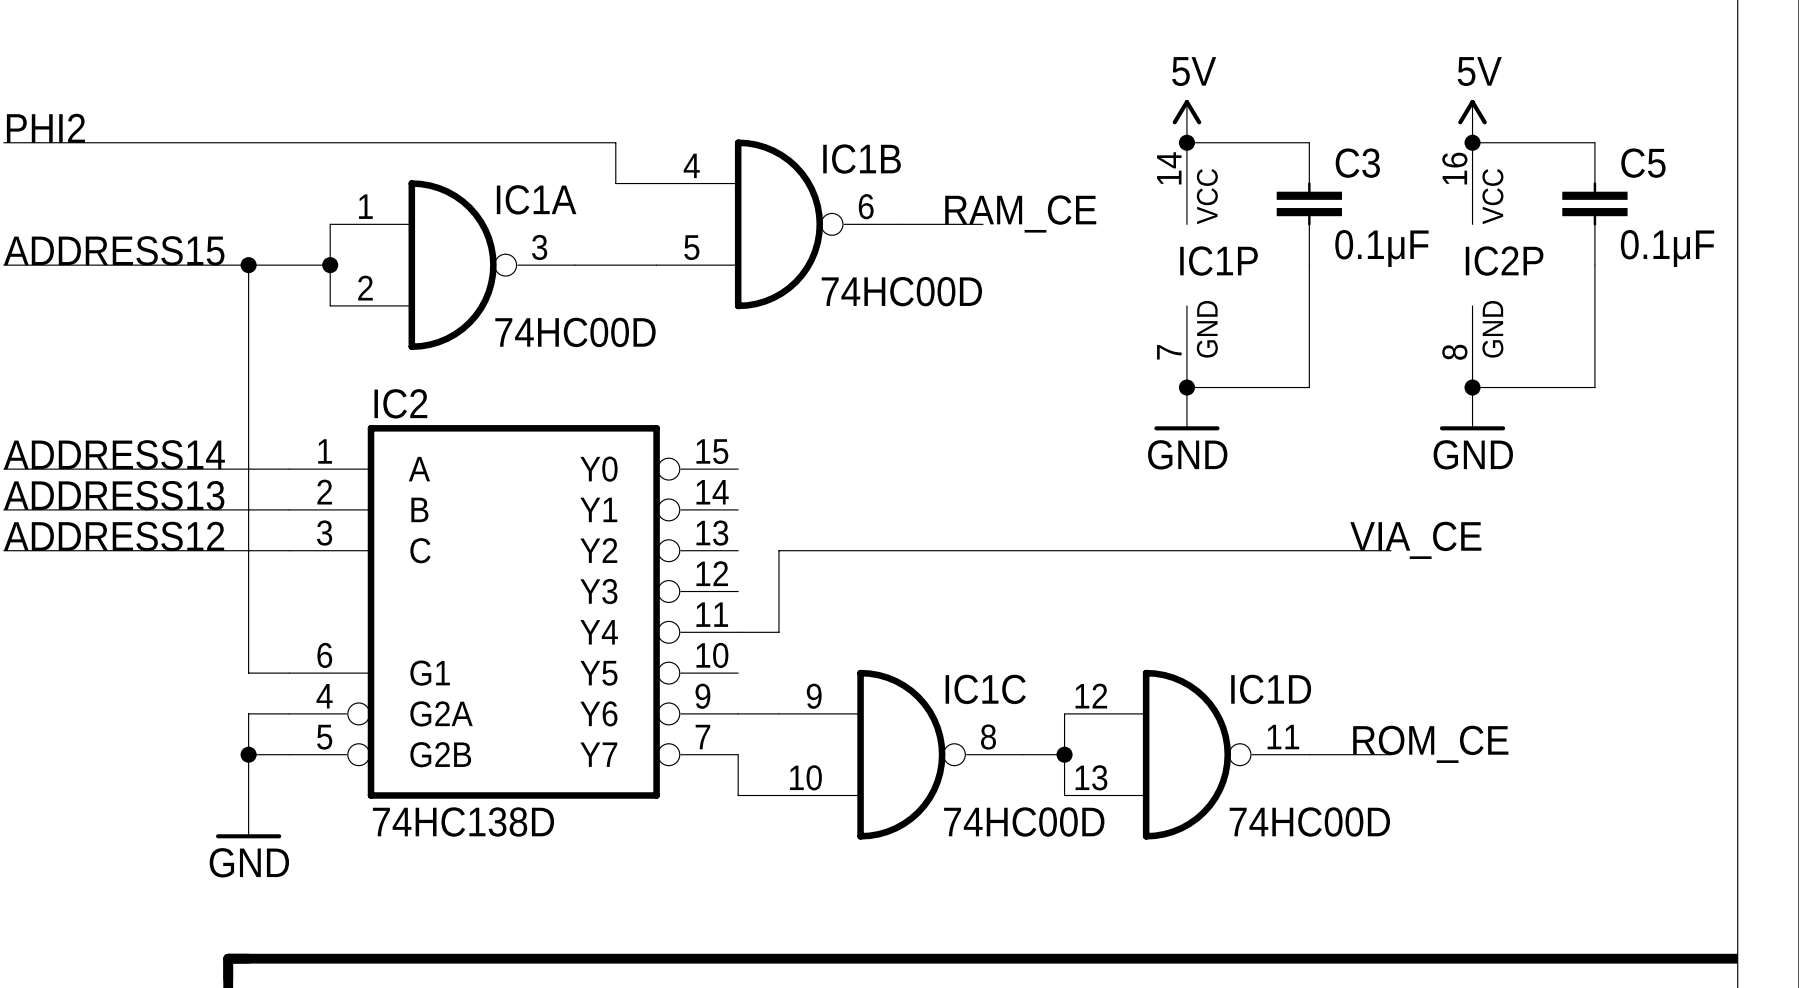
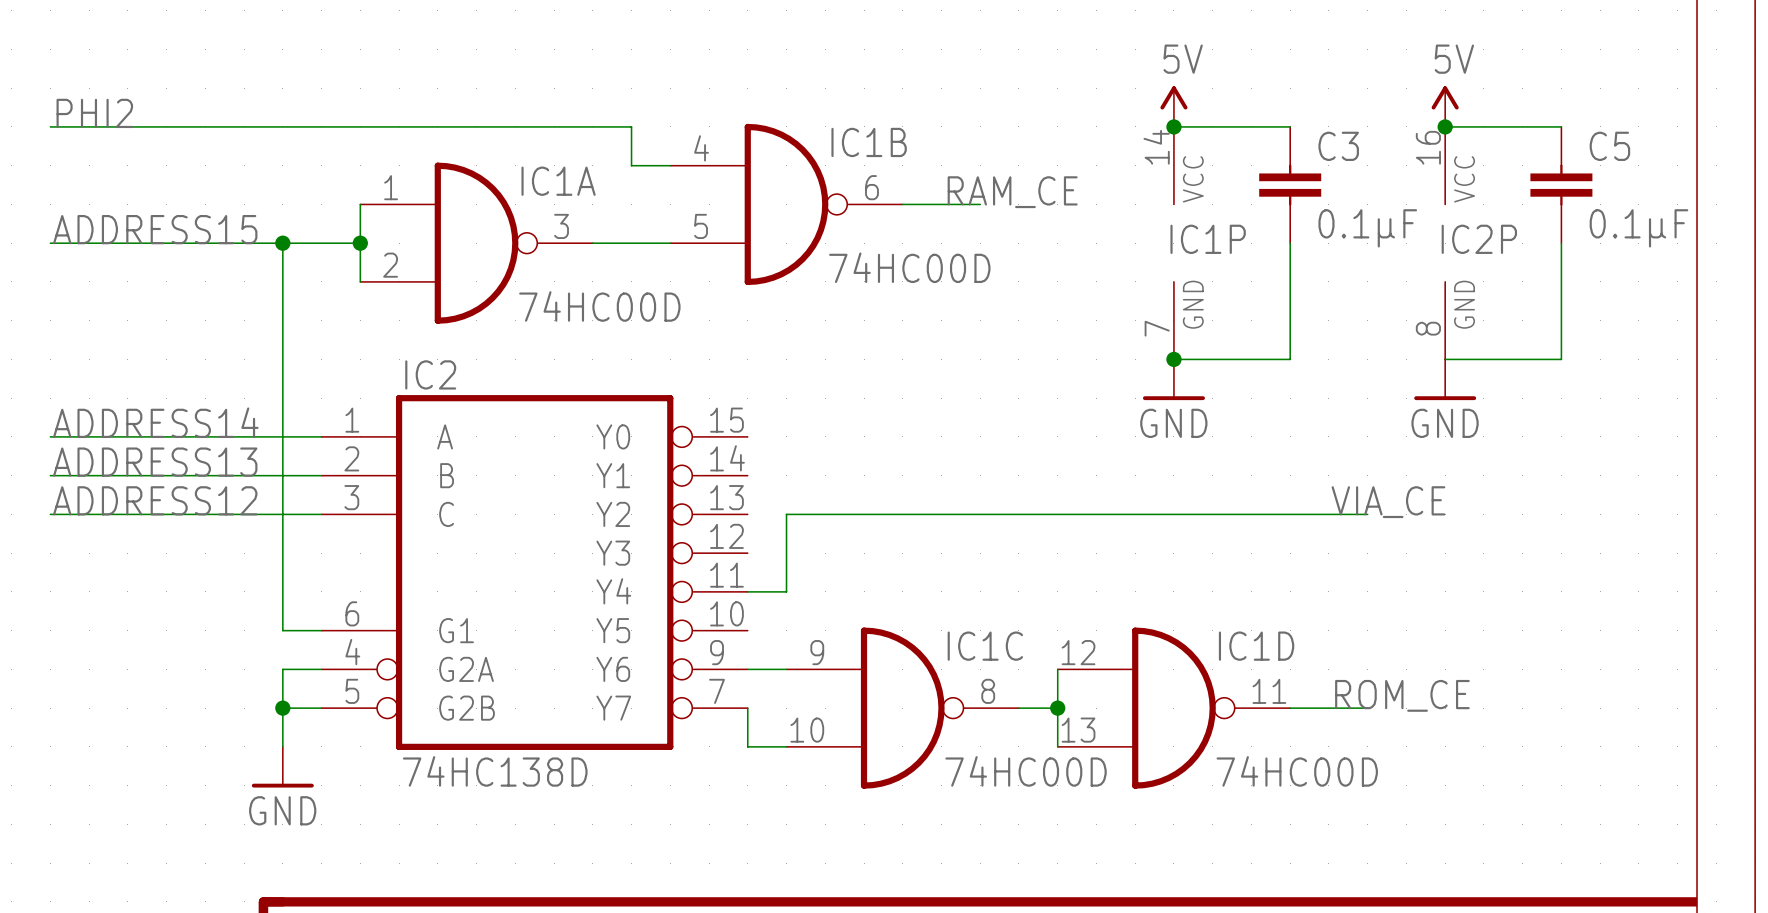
junction: (1472, 387) -> none

